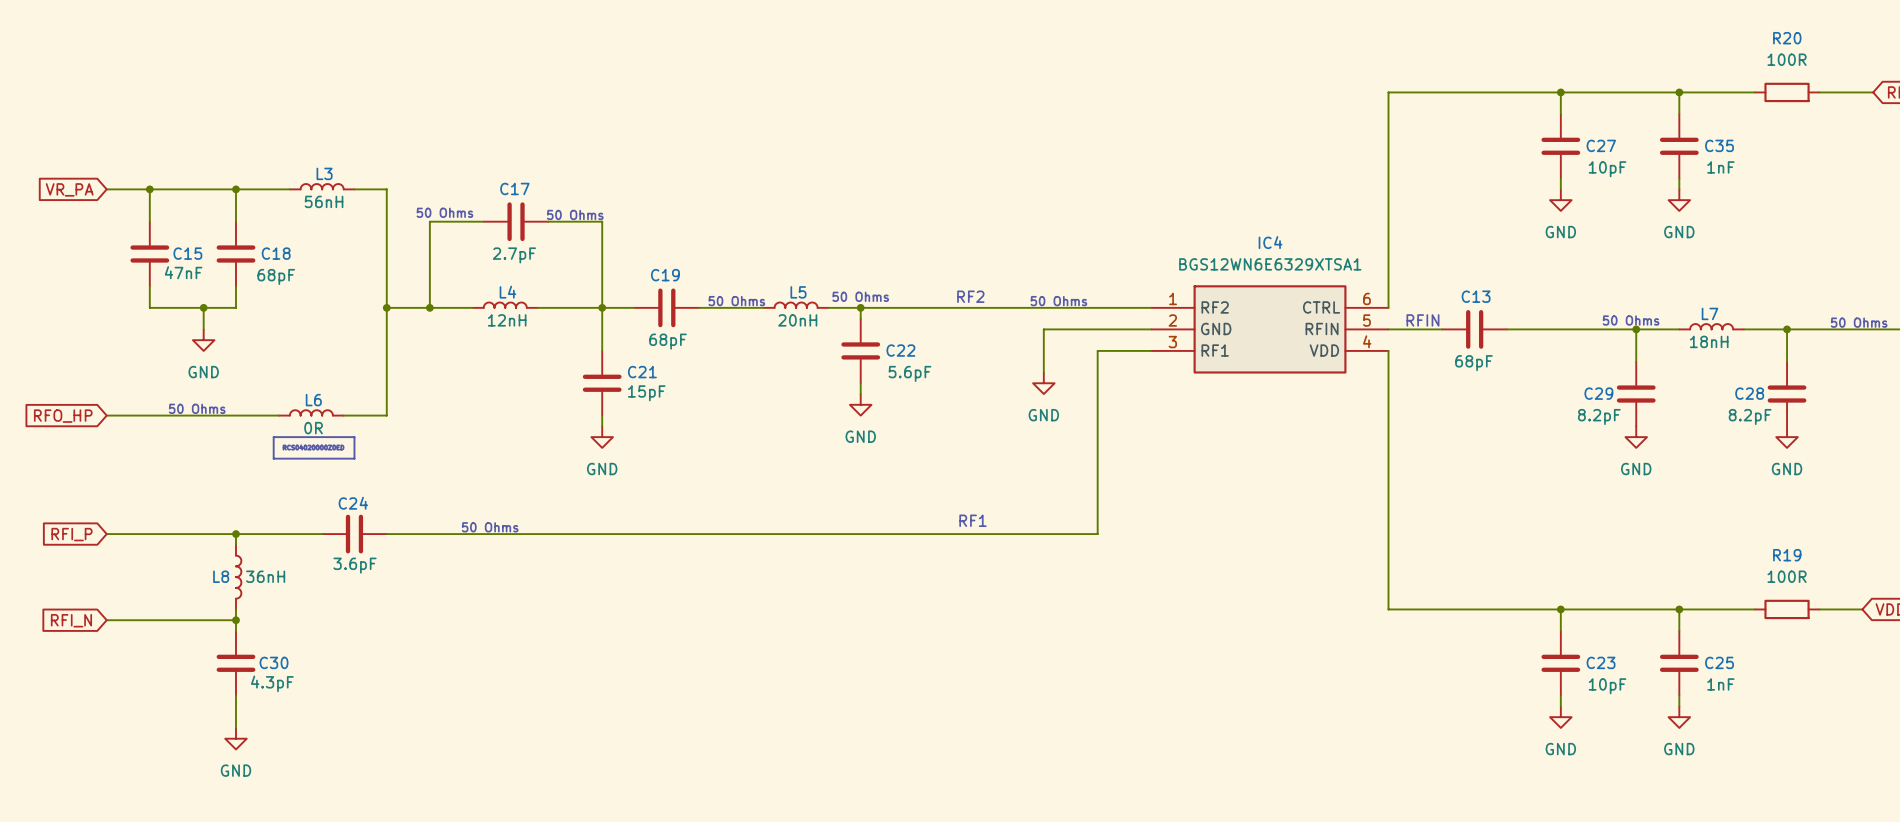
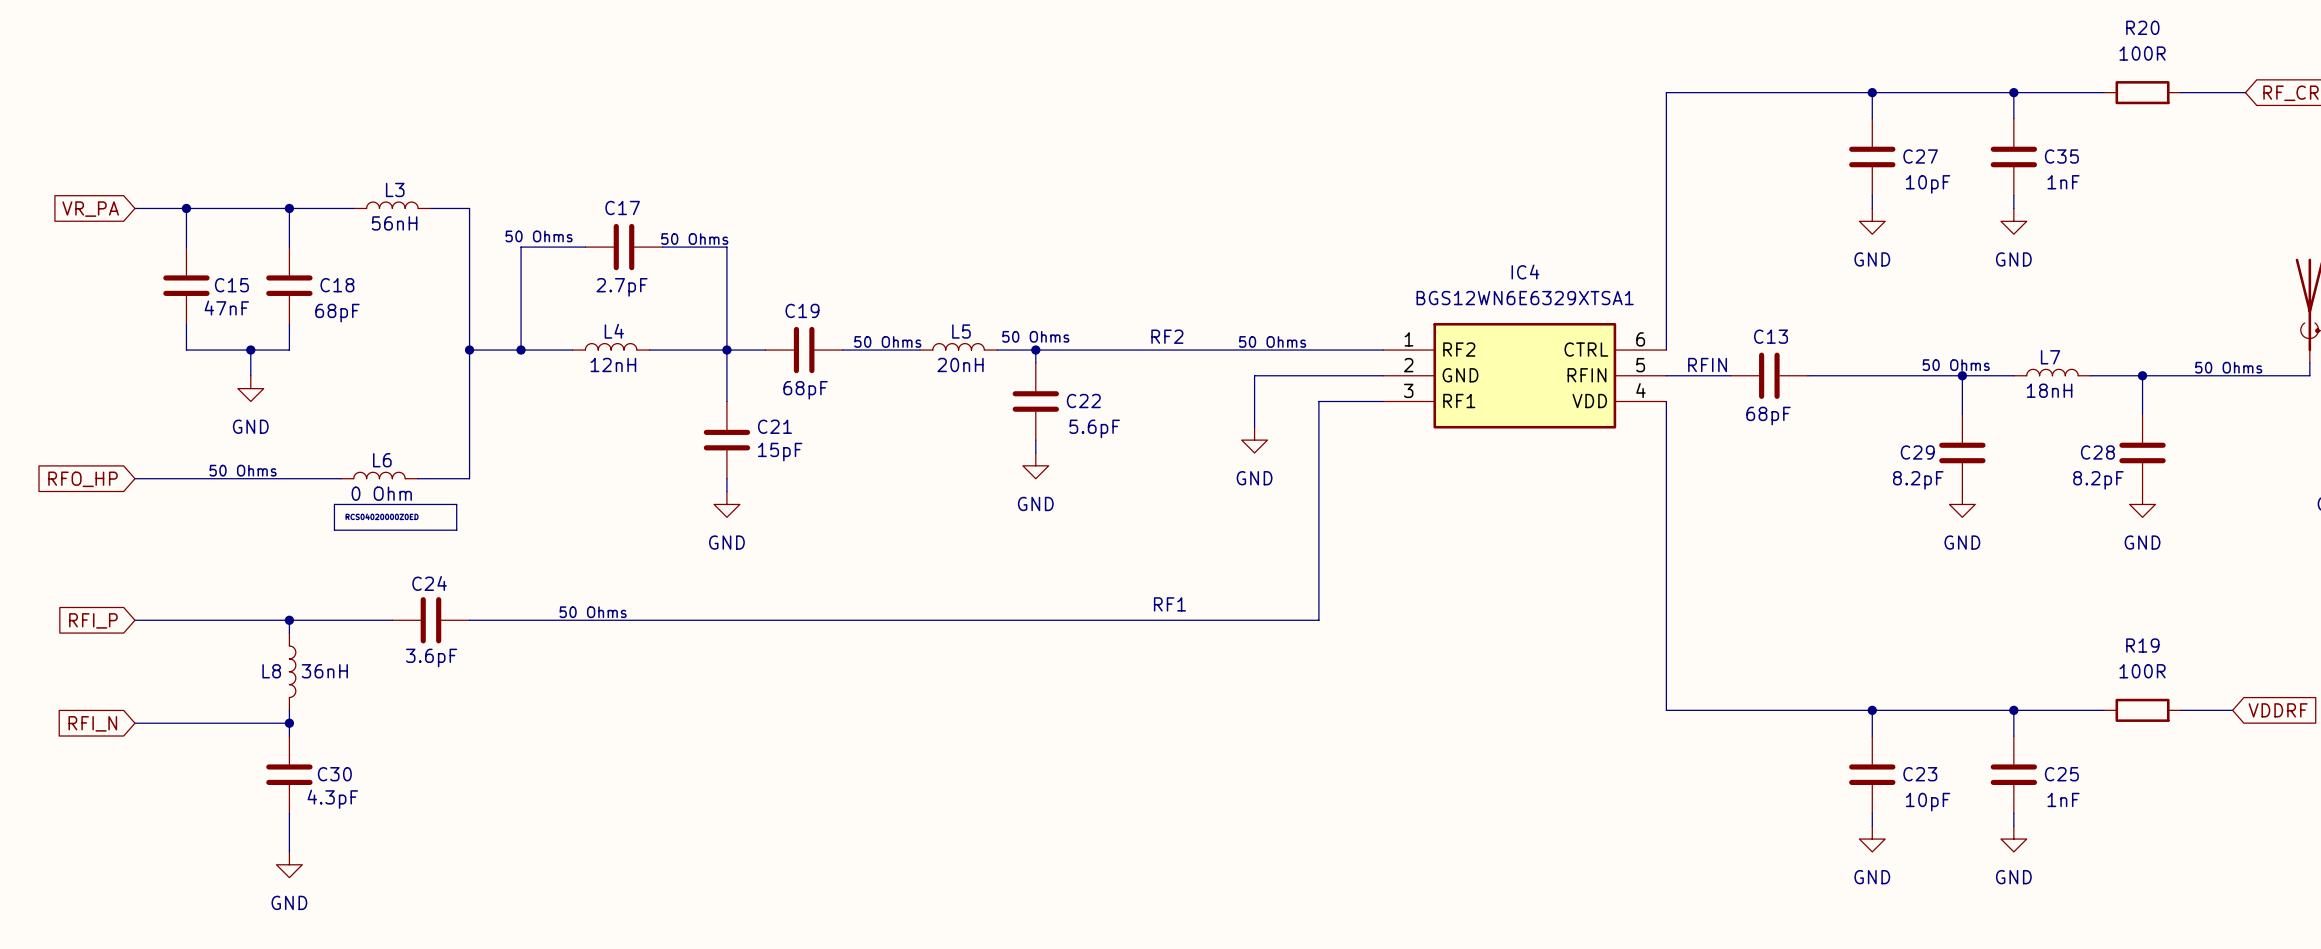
L6 value: 0R (313, 428) -> 0 Ohm (381, 493)
line: (354, 437) (354, 458) -> (430, 504) (456, 504) (456, 530) (430, 530)

